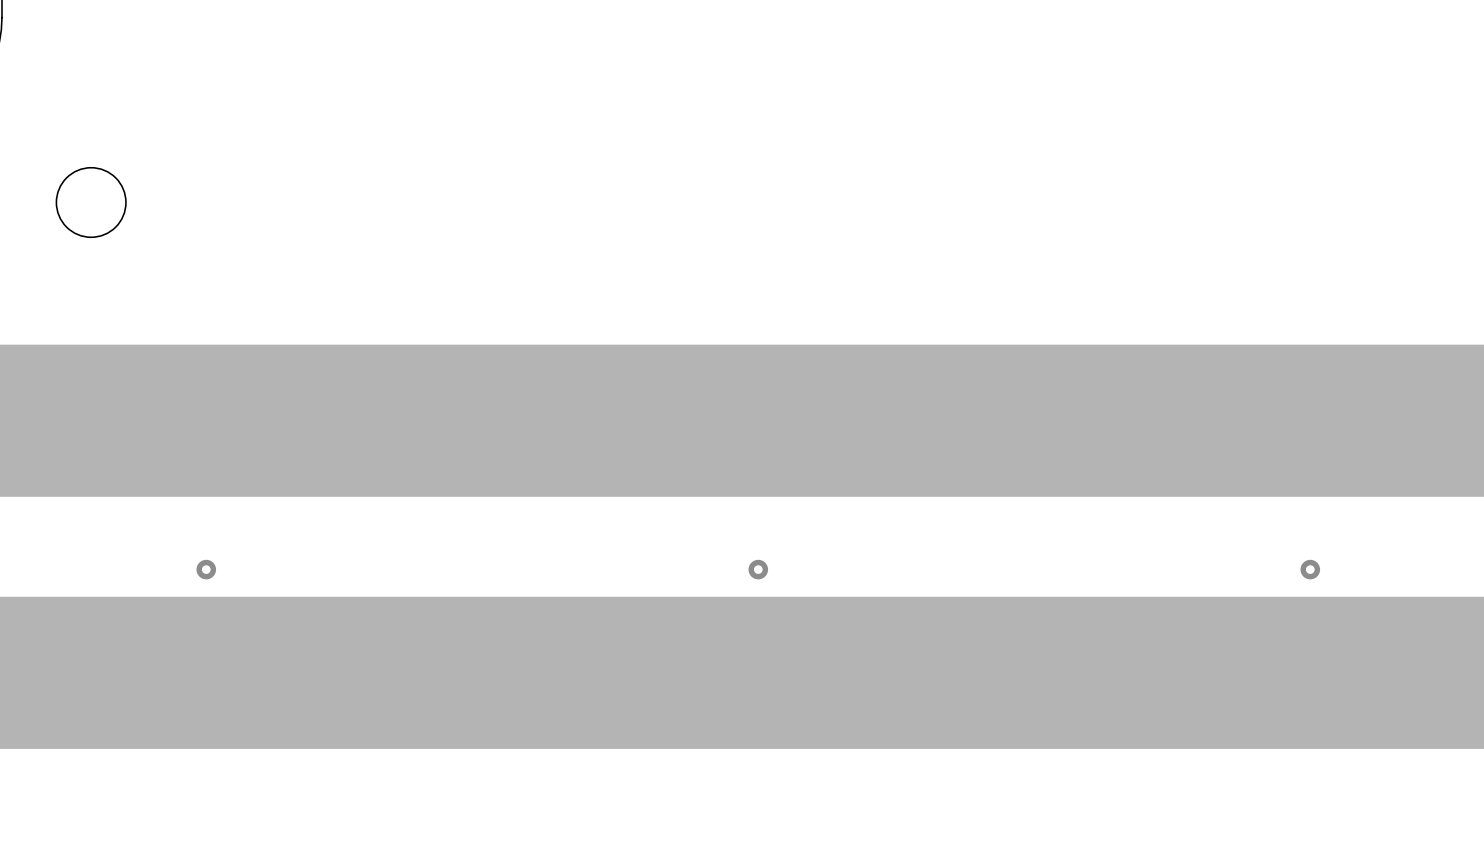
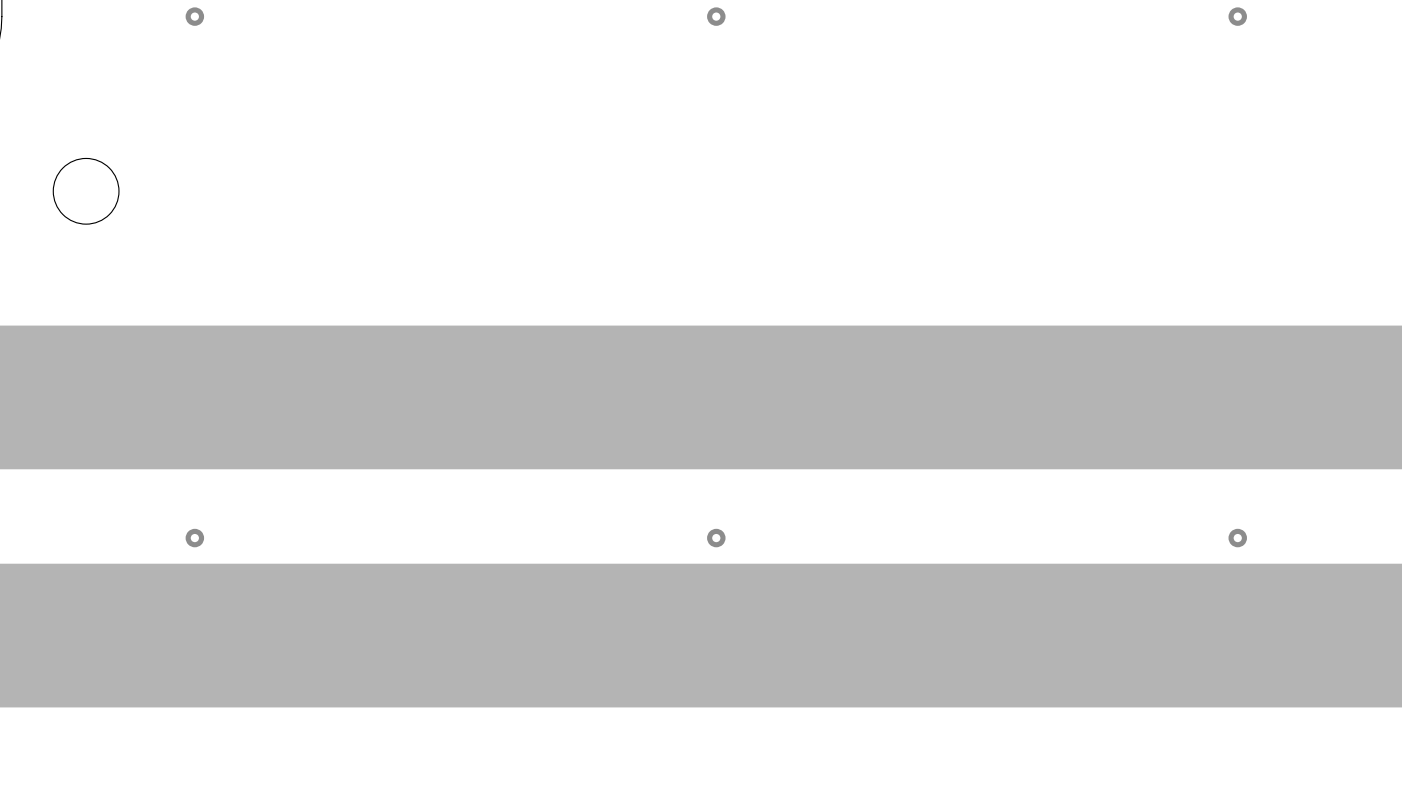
via: none -> (194, 16)
via: none -> (716, 16)
via: none -> (1237, 16)

